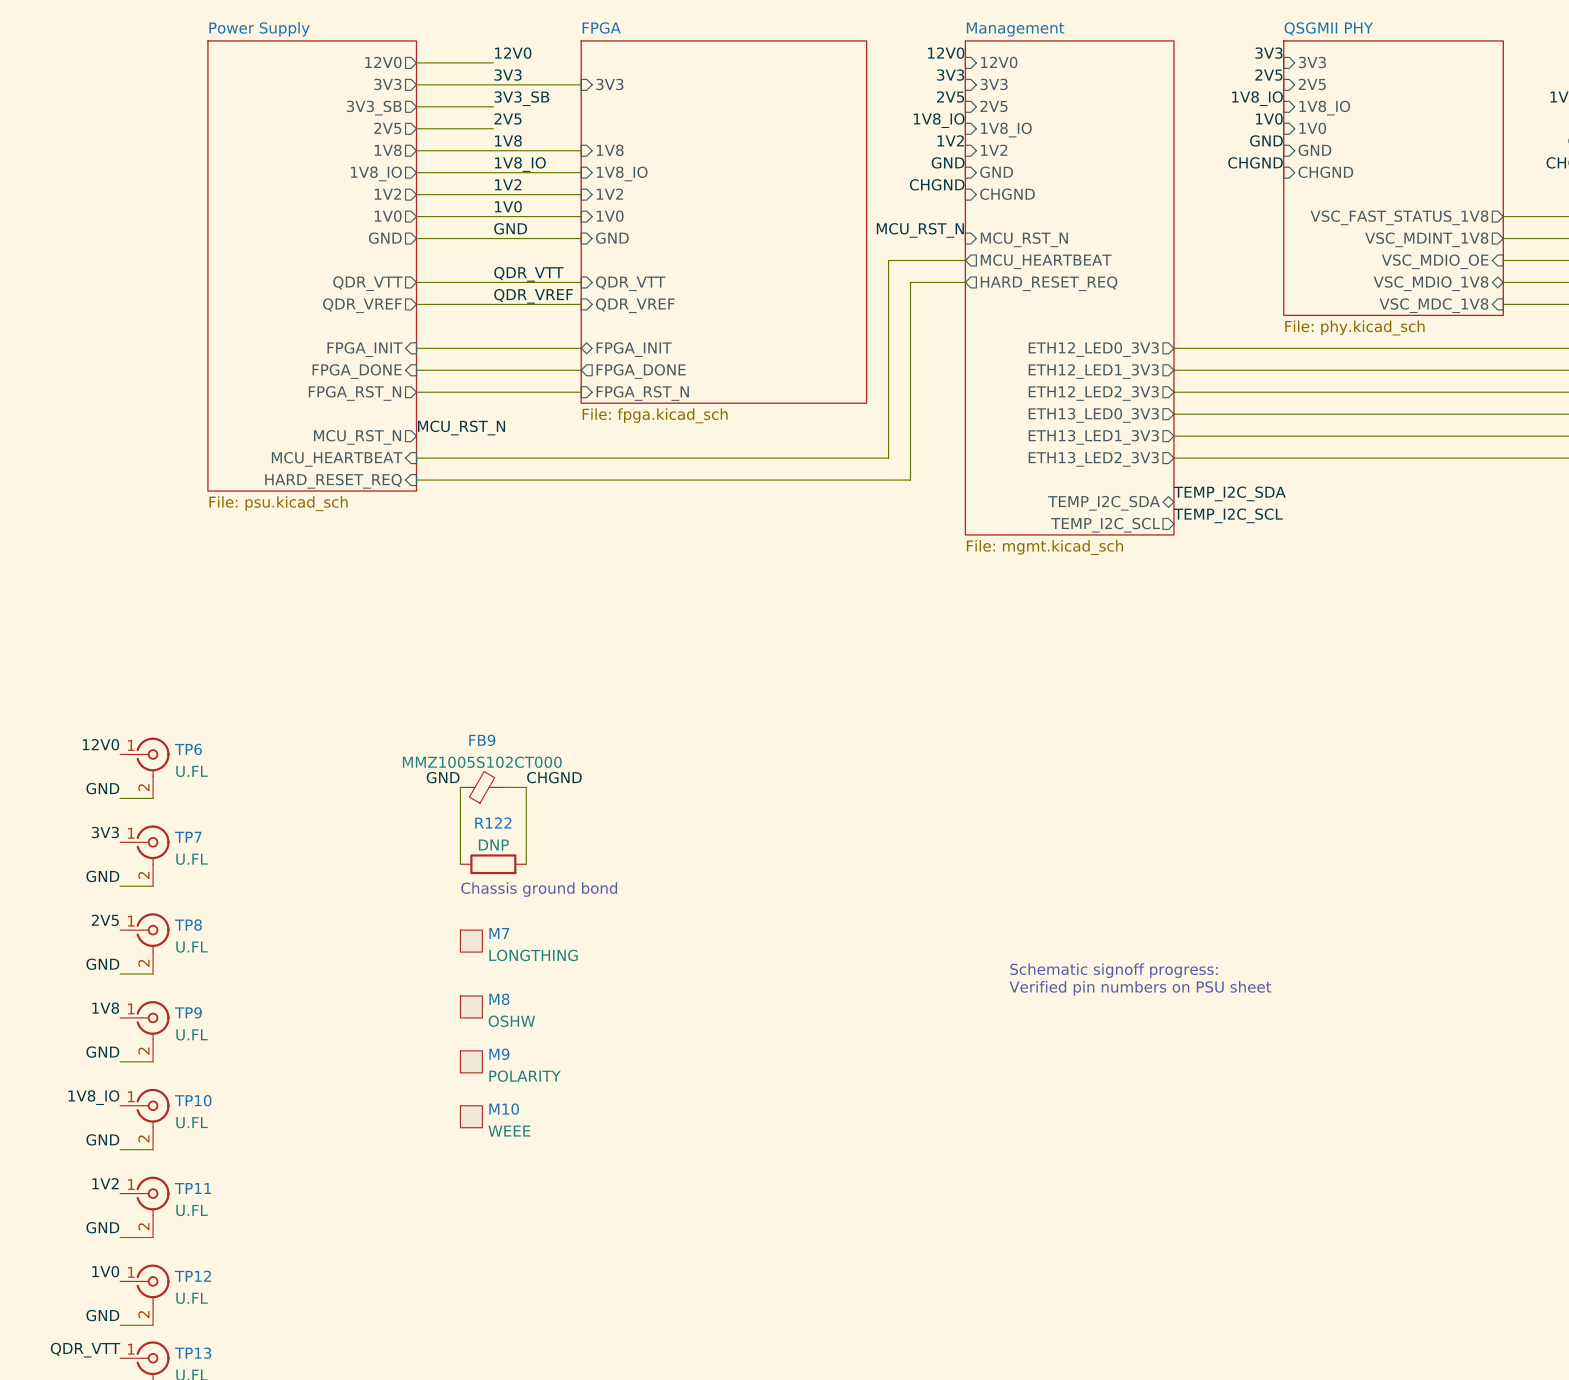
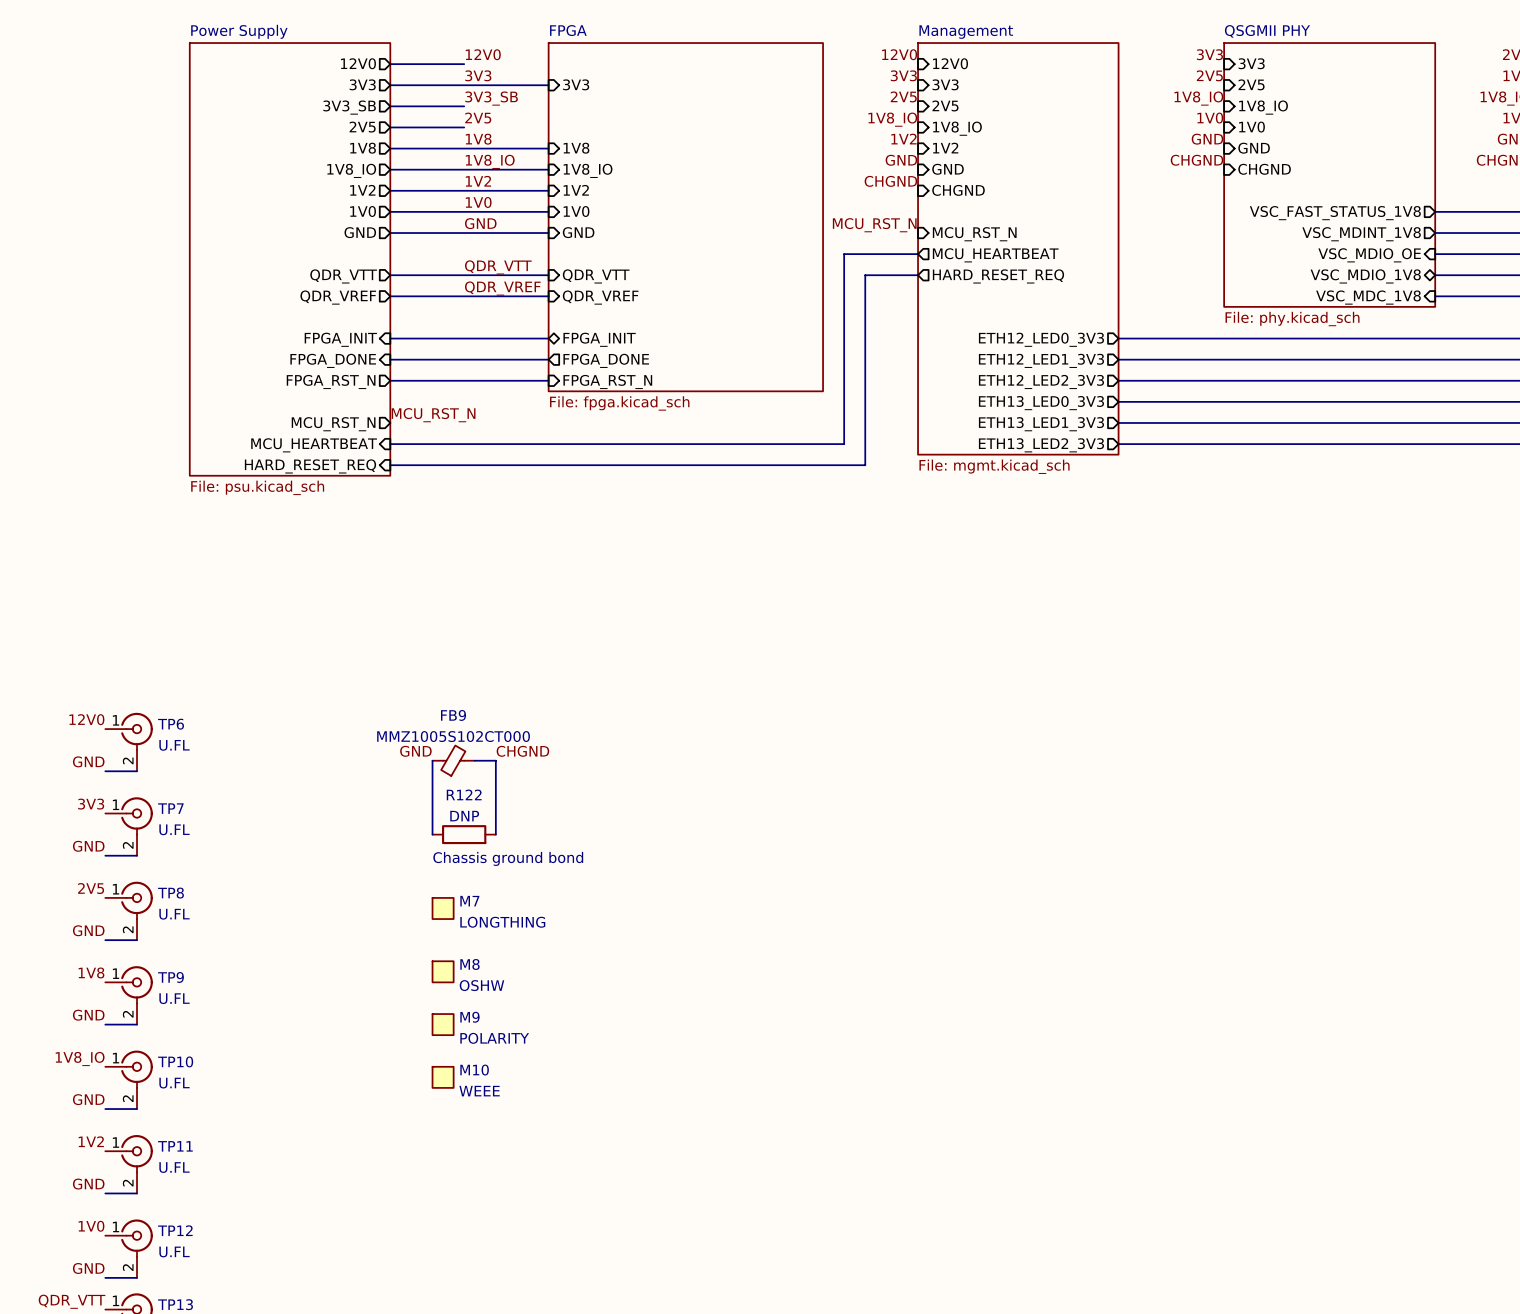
sheet Management: none -> File: mgmt.kicad_sch (1018, 248)
sheet Management: File: mgmt.kicad_sch (1069, 287) -> none
label: TEMP_I2C_SDA (1229, 493) -> none
sheet pin: TEMP_I2C_SDA (1104, 503) -> none
label: TEMP_I2C_SCL (1228, 515) -> none
sheet pin: TEMP_I2C_SCL (1105, 525) -> none
text: Schematic signoff progress: (1114, 970) -> none
text: Verified pin numbers on PSU sheet (1140, 988) -> none

